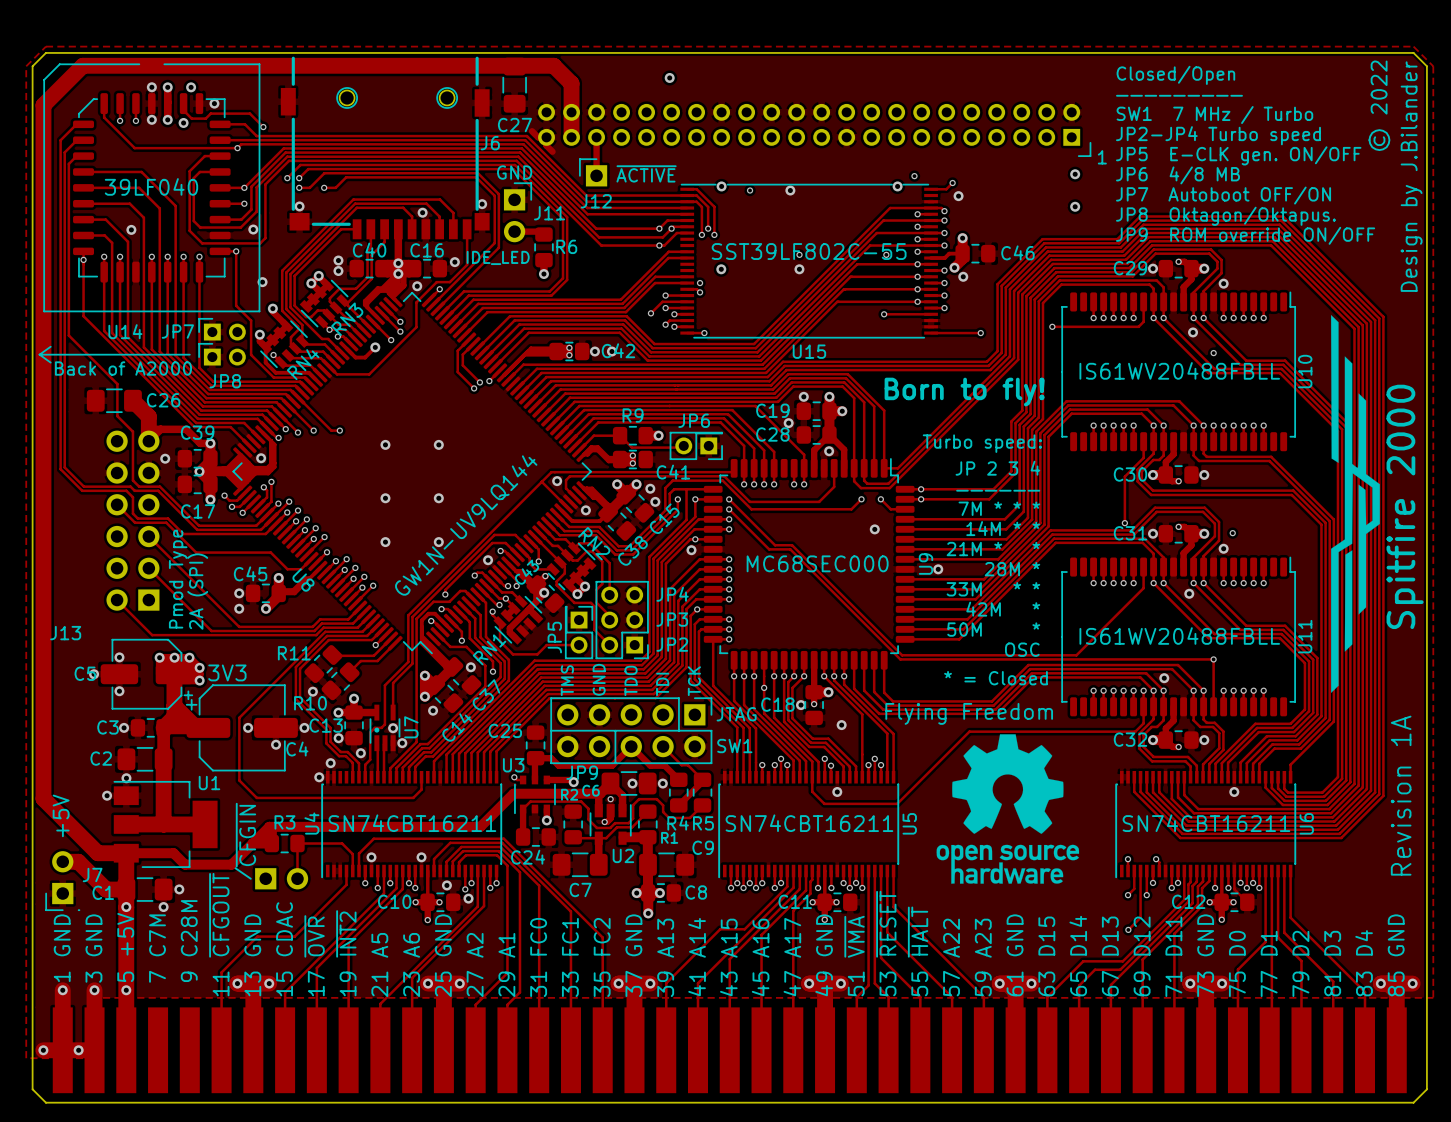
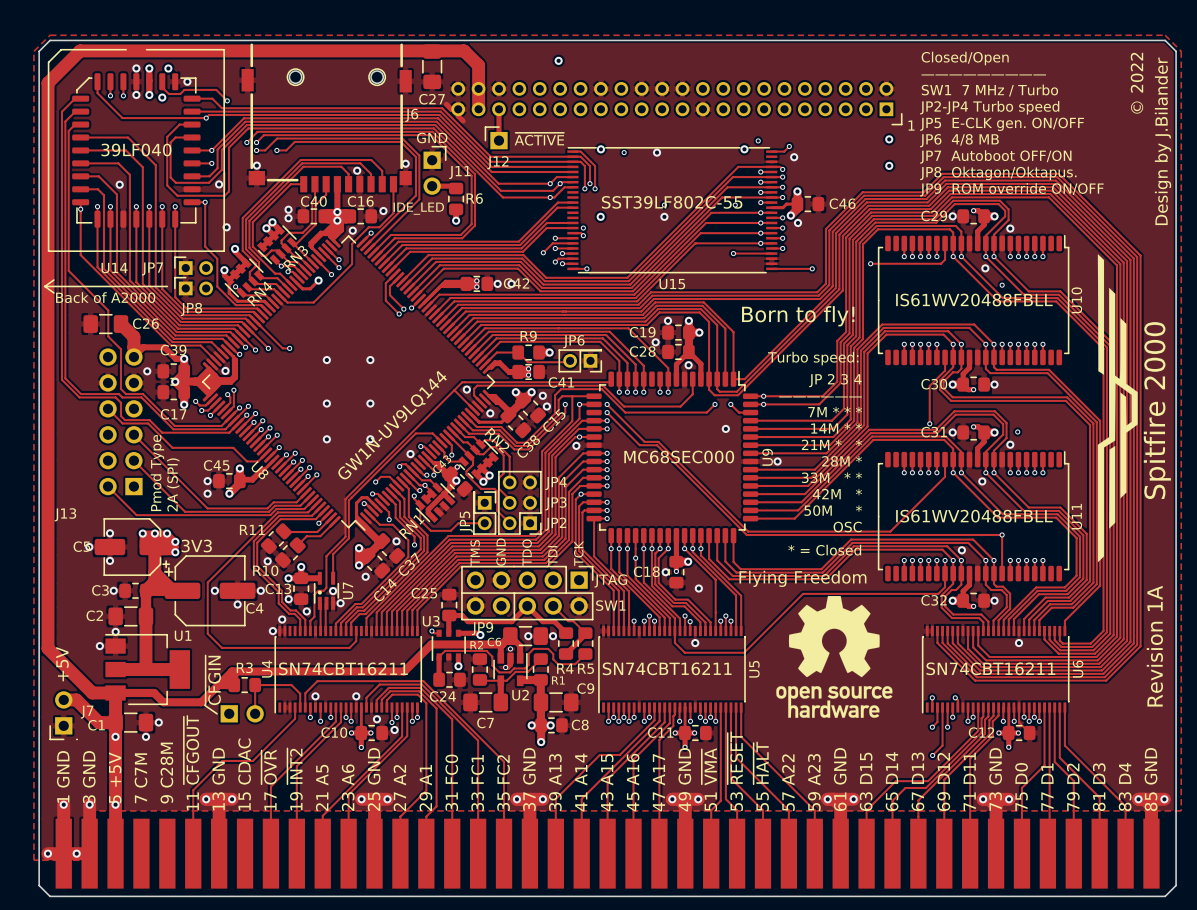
track: (517, 554) (505, 543) (492, 543) (445, 590) (445, 594) -> (391, 479) (389, 476) (380, 476) (375, 482)
track: (465, 591) (460, 591) (449, 601) (433, 601) (416, 618) (416, 742) (390, 768) (390, 777) -> none
track: (384, 871) (384, 893) (285, 992) (285, 1050) -> none

